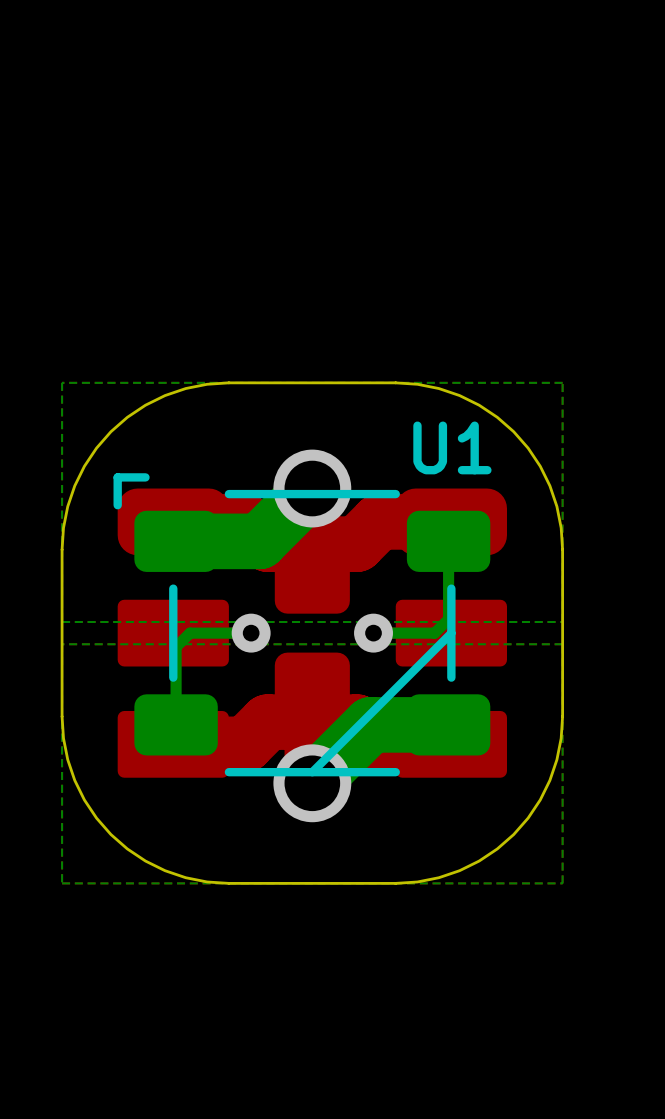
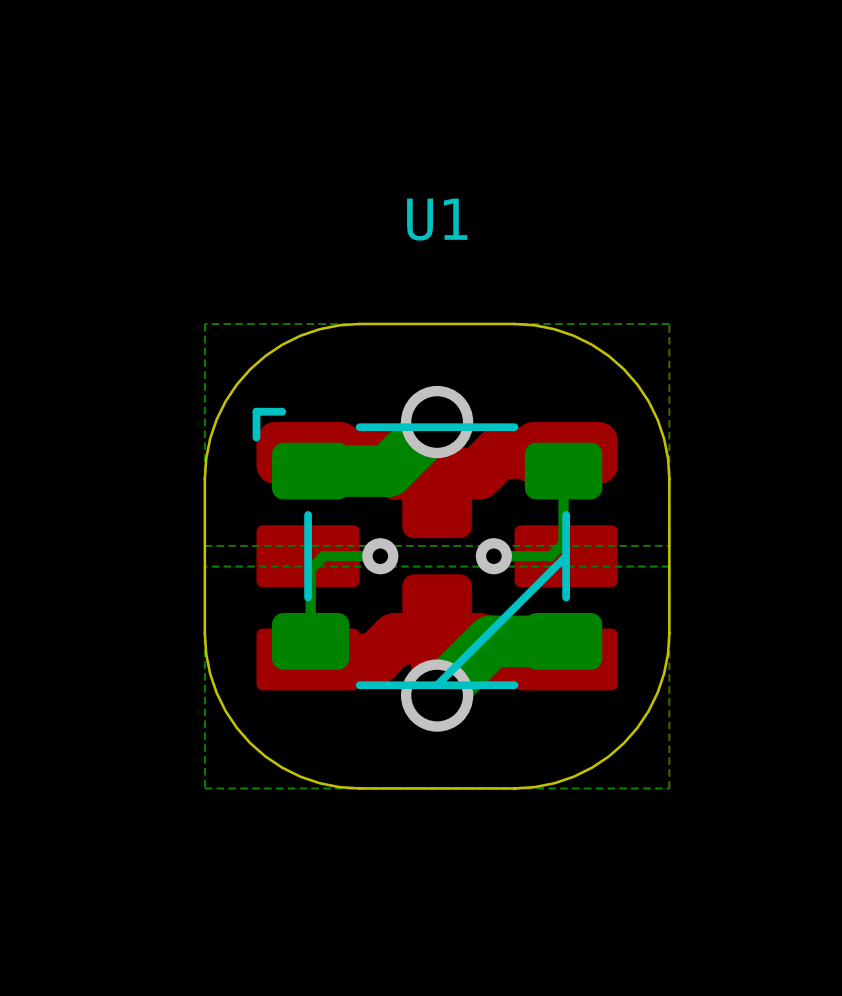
U1 name position: U1 (452, 447) -> U1 (437, 219)

